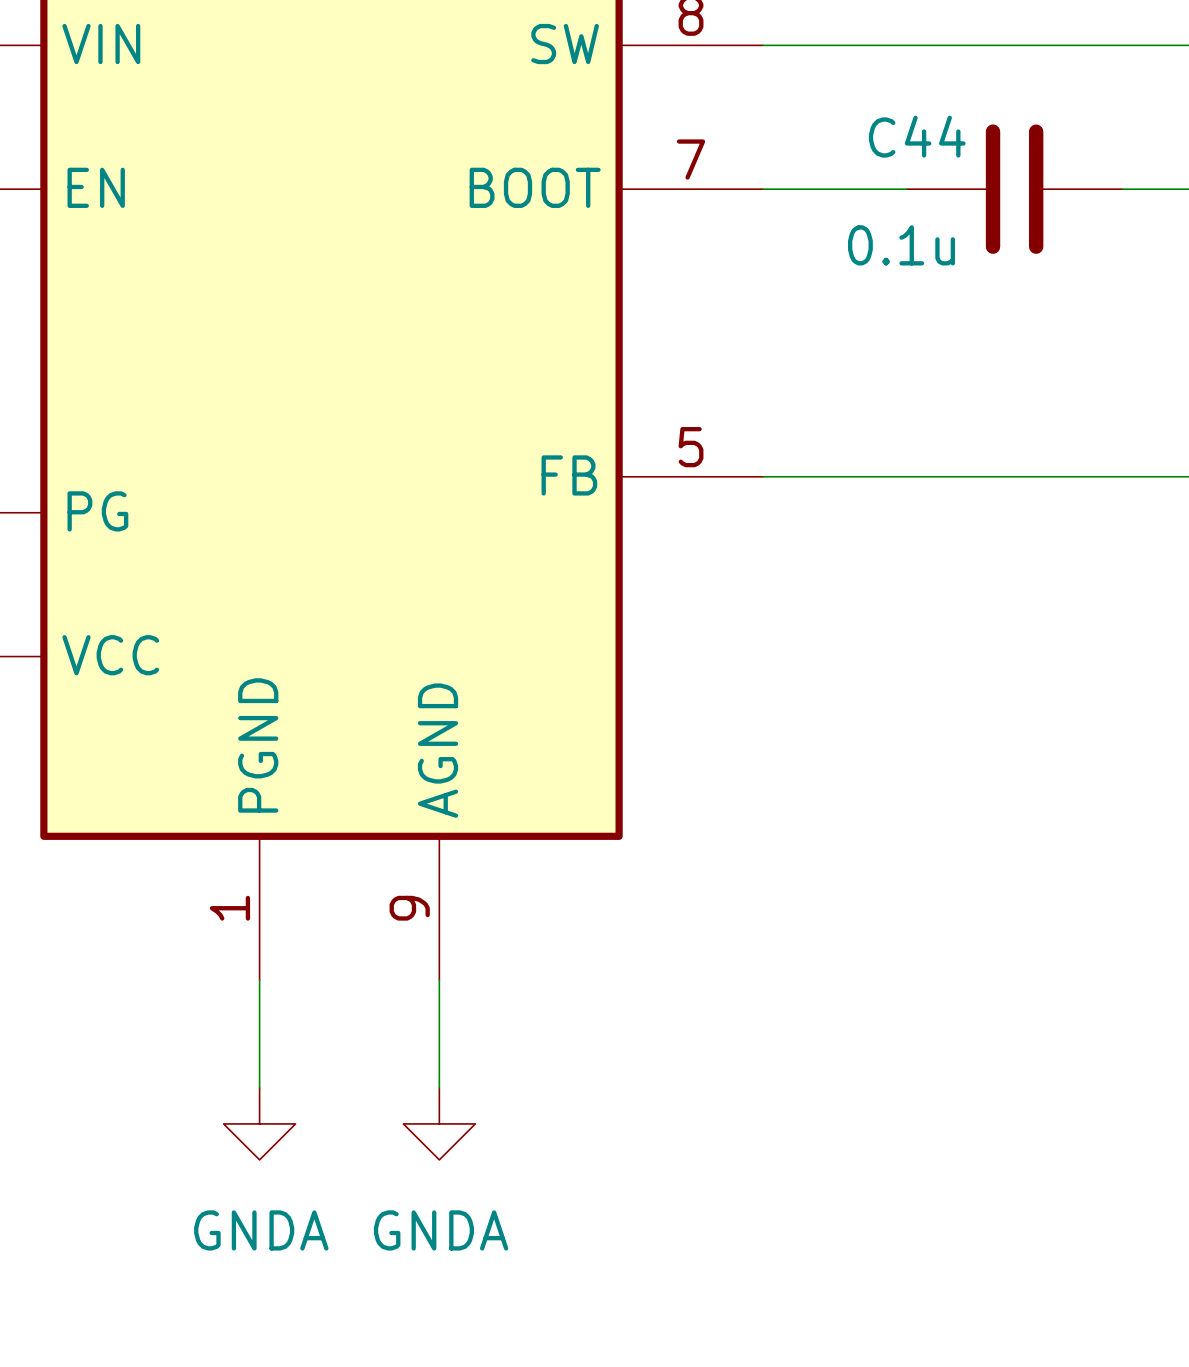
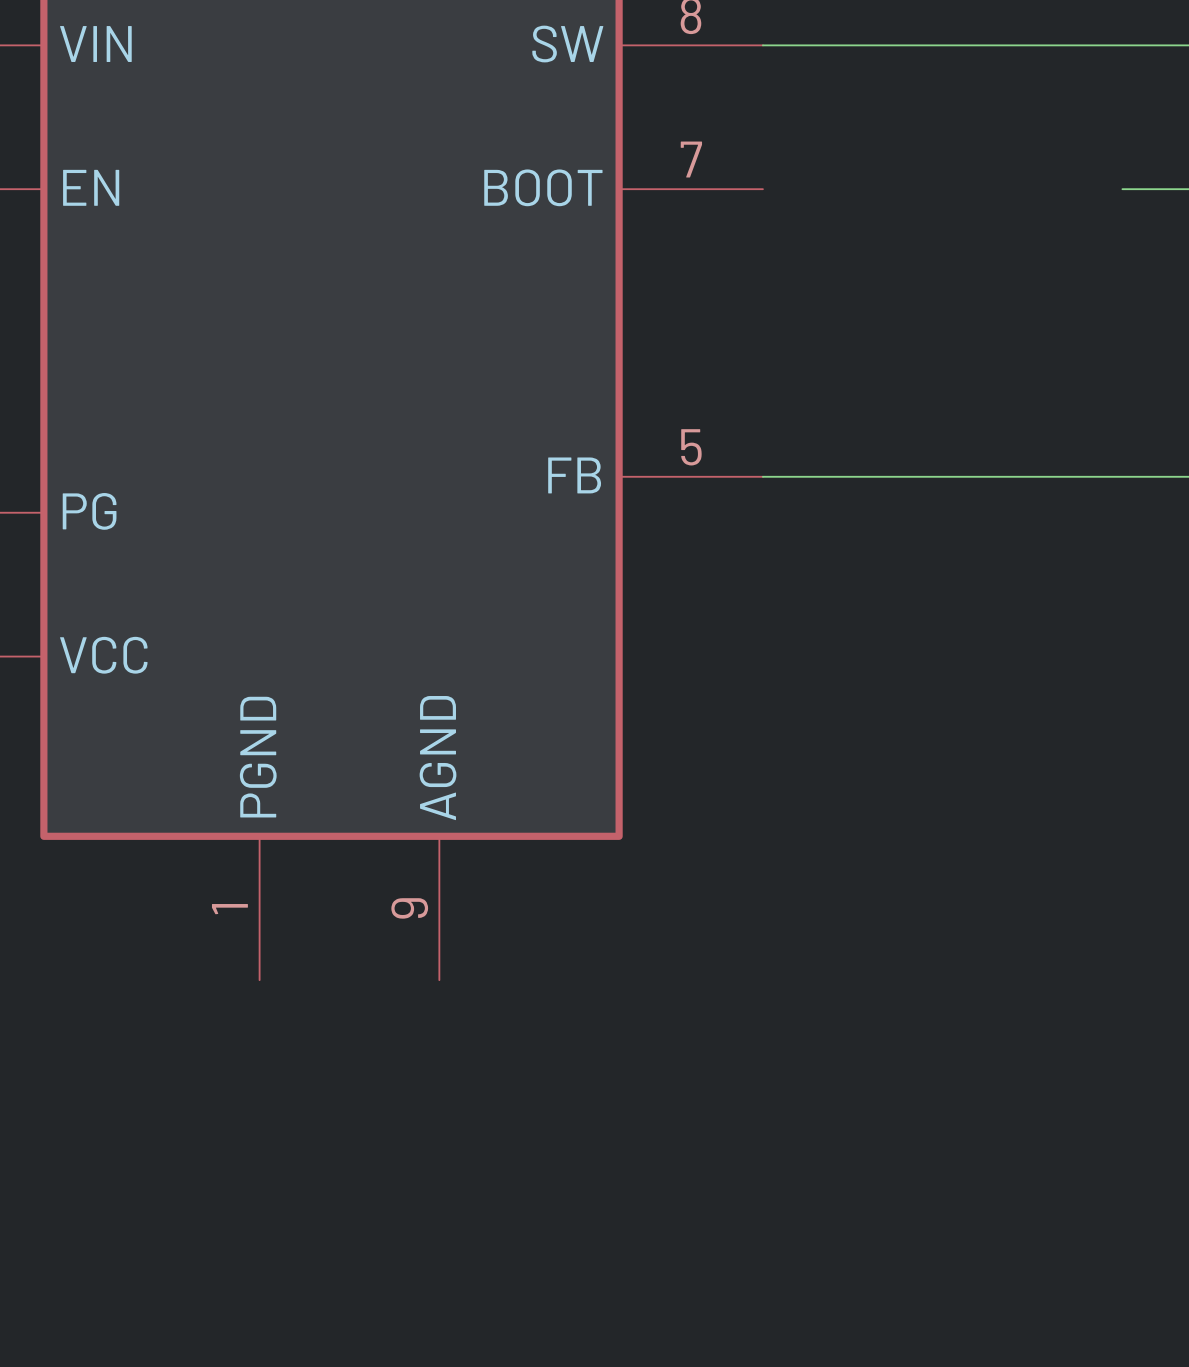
wire: (762, 189) (906, 189) -> none
C44: 0.1u (1014, 189) -> none
wire: (259, 980) (259, 1087) -> none
wire: (439, 980) (439, 1087) -> none
power symbol: GNDA (259, 1123) -> none
power symbol: GNDA (439, 1123) -> none

